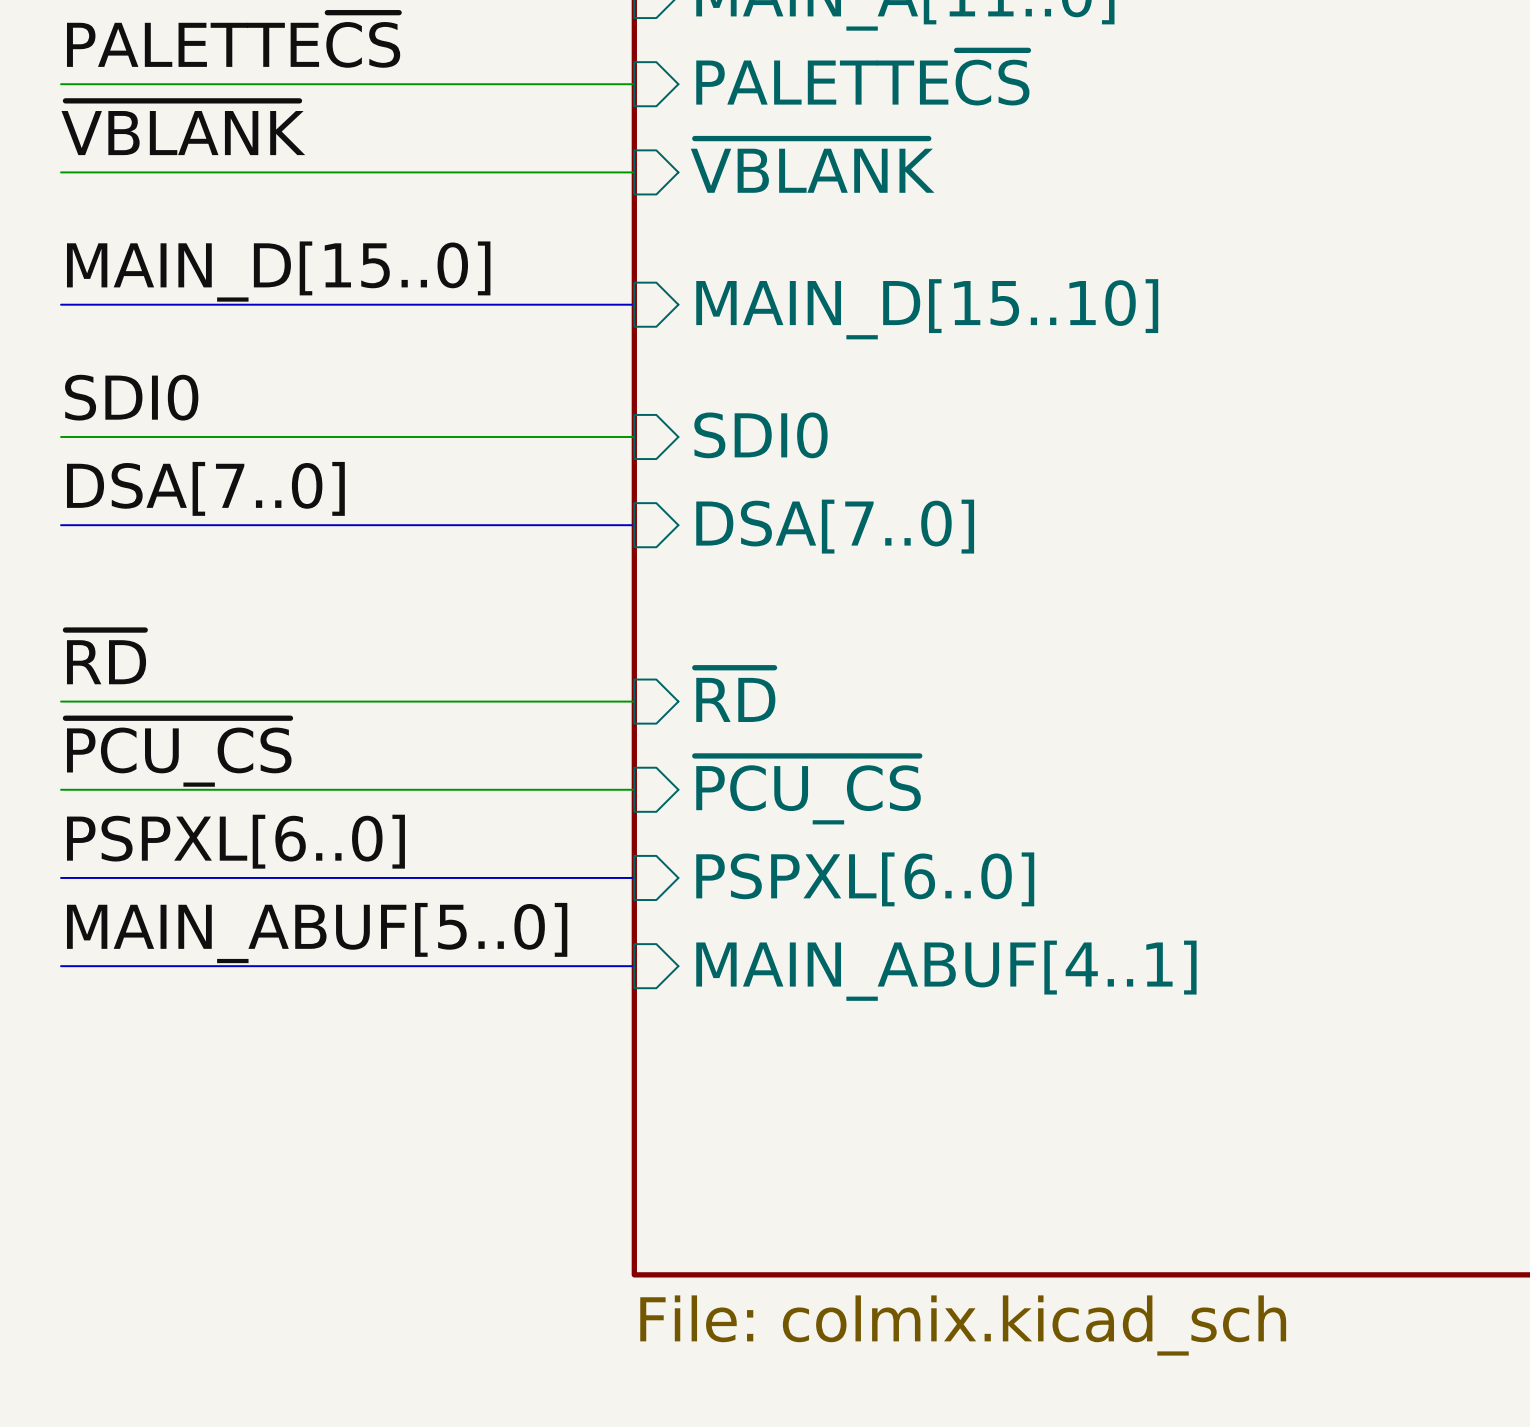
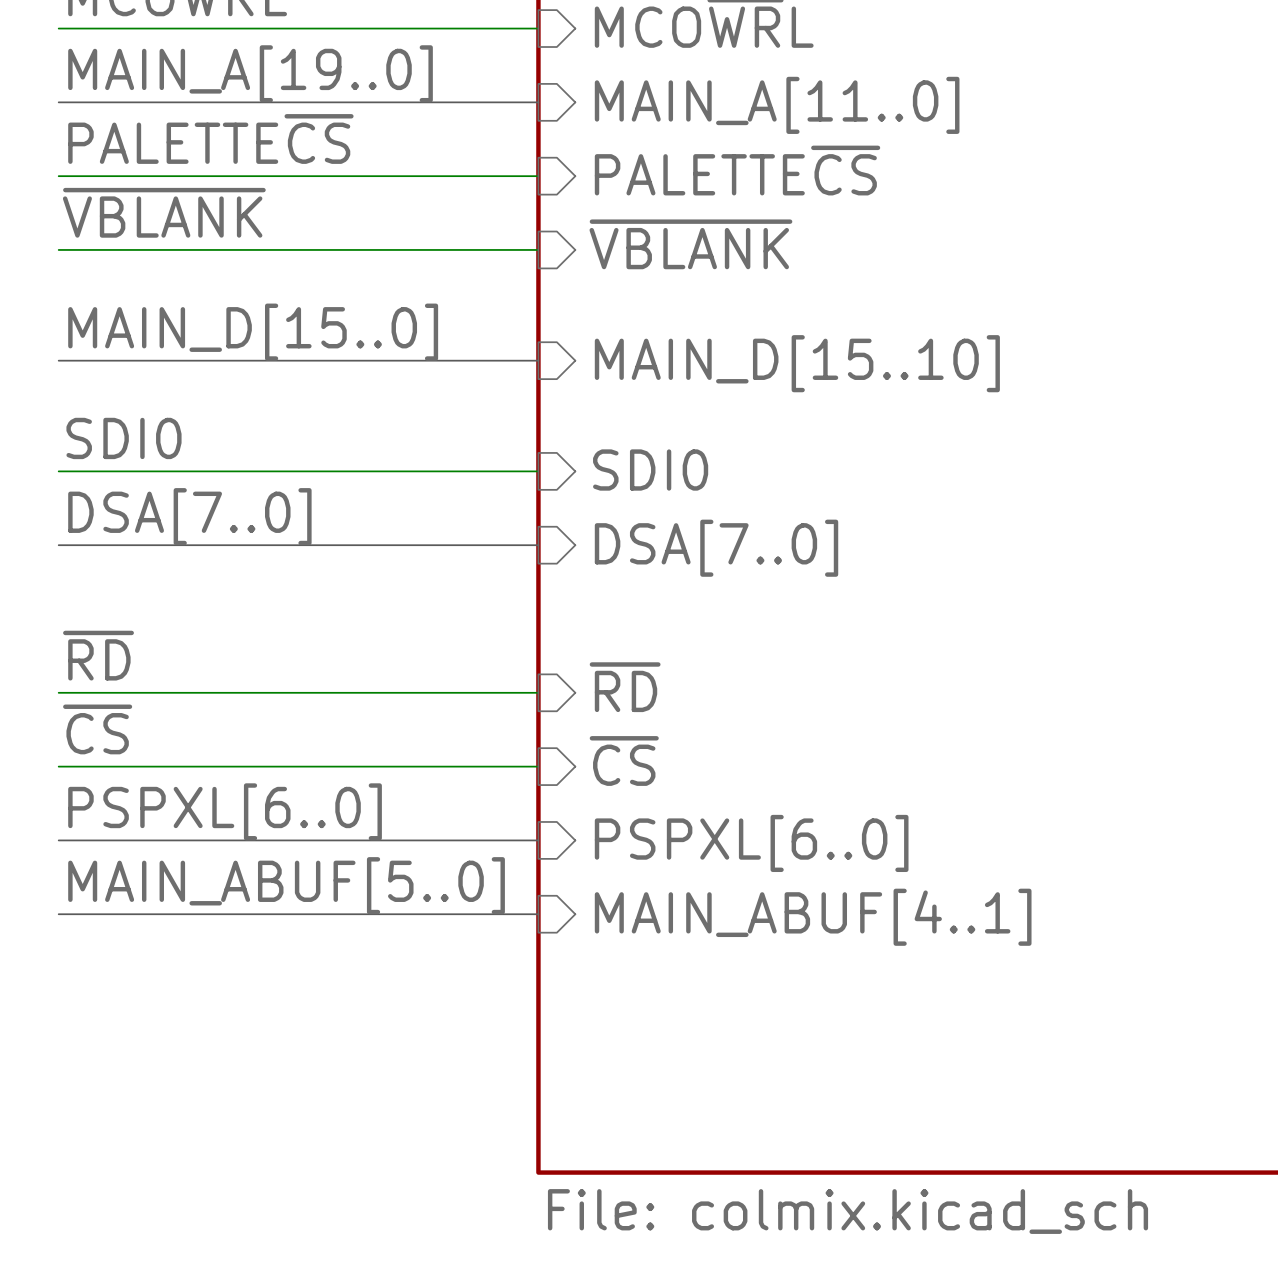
label: ~{PCU_CS} (178, 752) -> ~{CS} (97, 729)
sheet pin: ~{PCU_CS} (807, 790) -> ~{CS} (624, 760)

